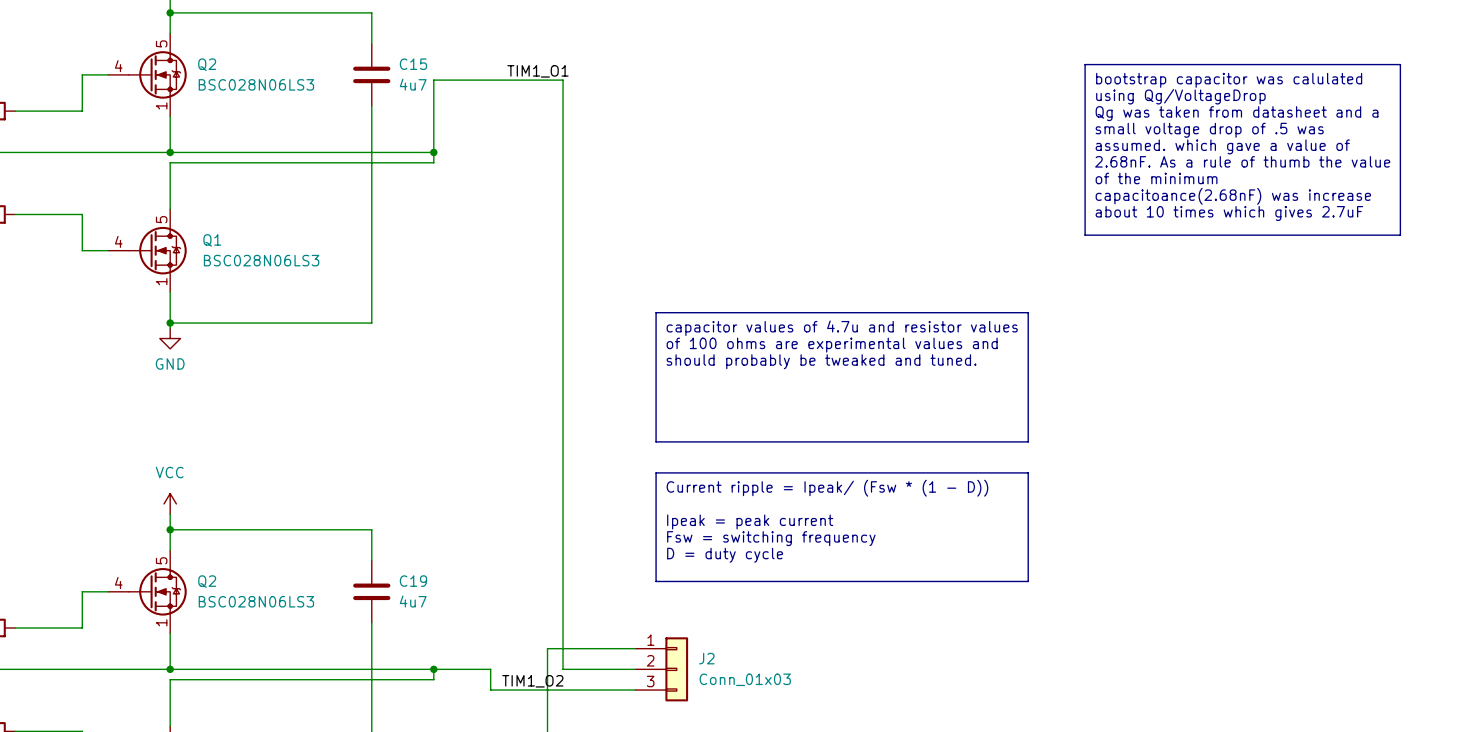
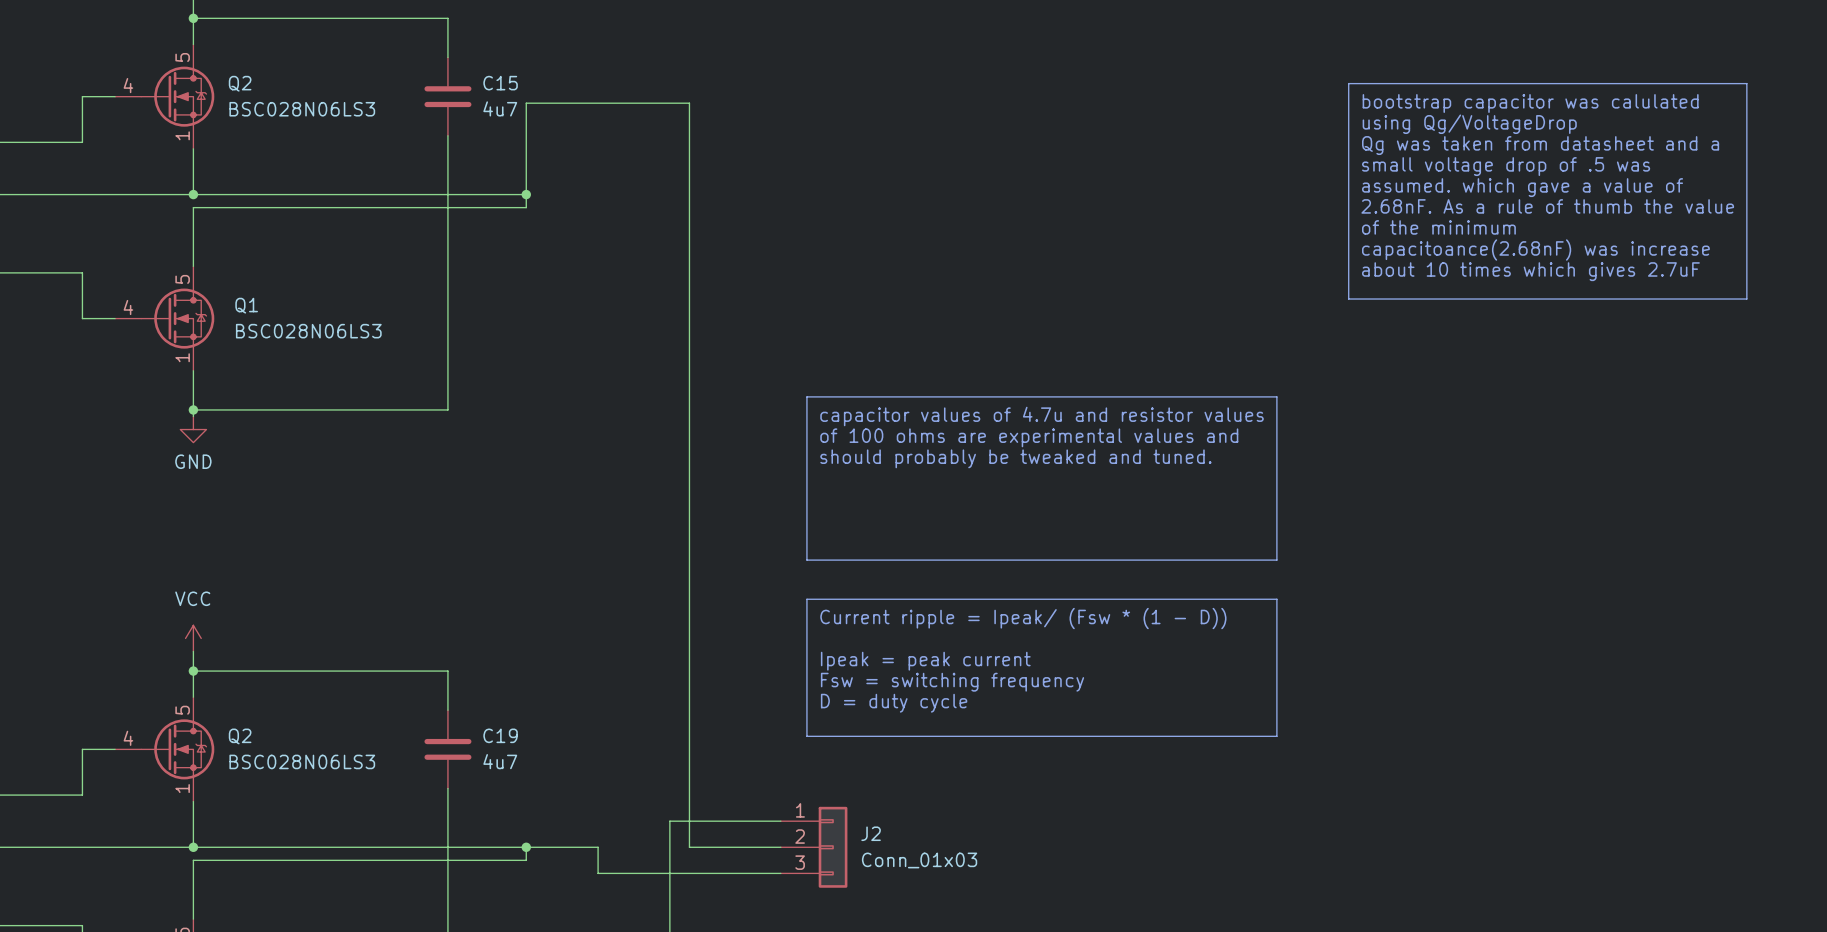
label: TIM1_O1 (537, 71) -> none
label: TIM1_O2 (532, 681) -> none

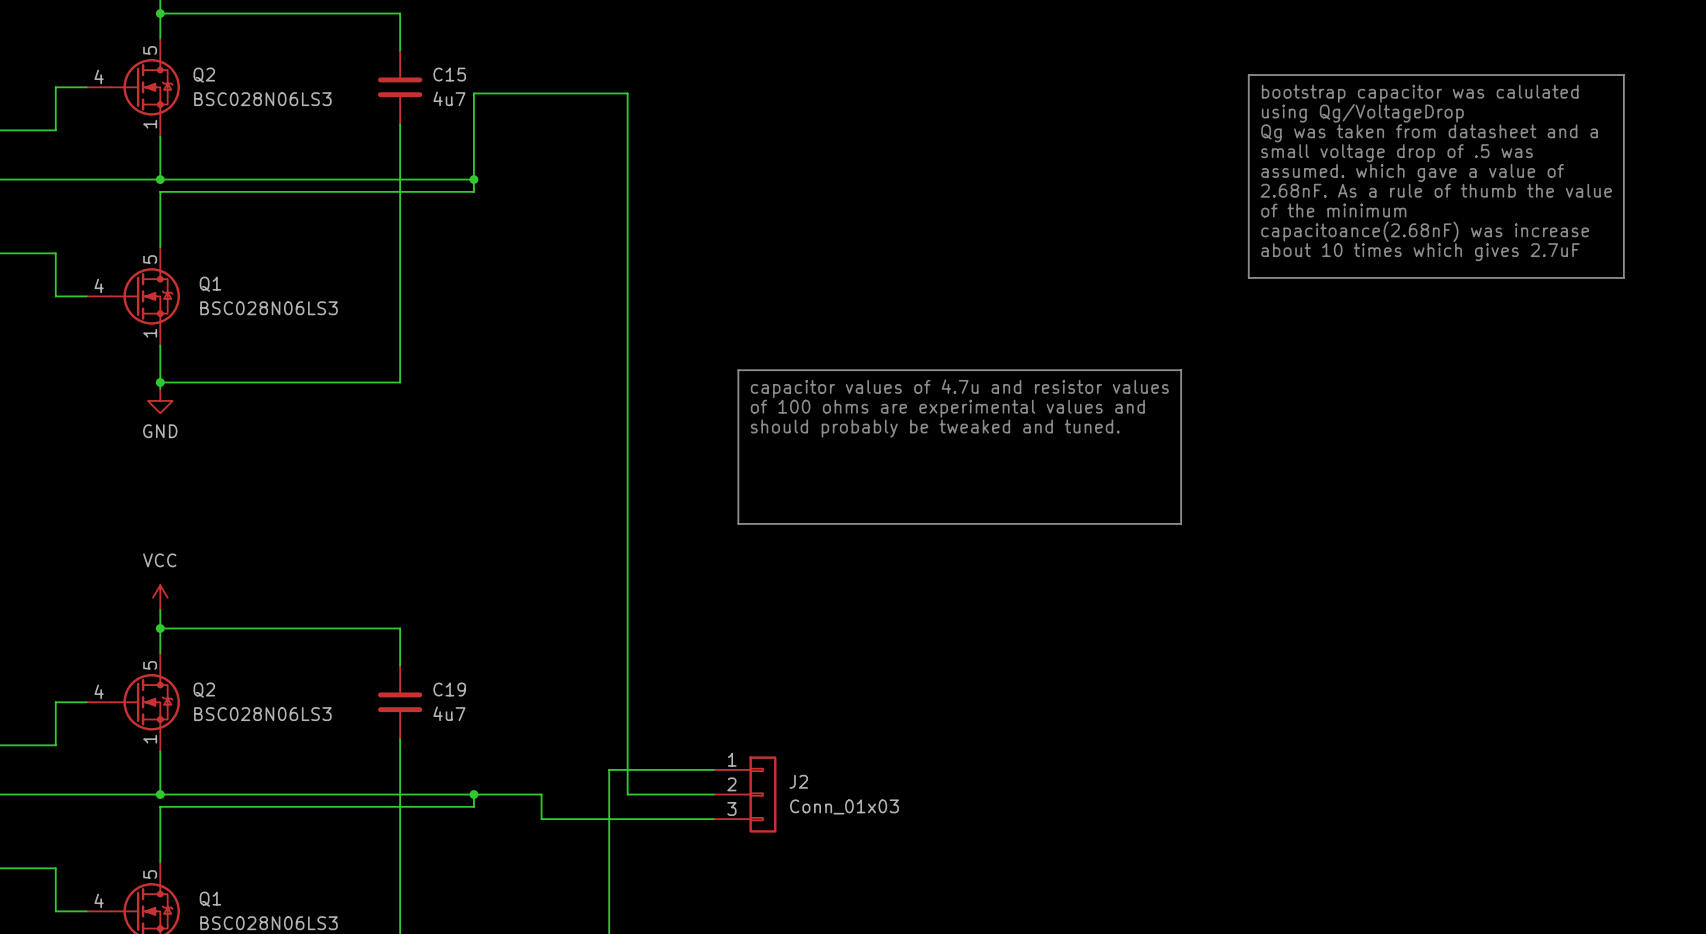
line: (806, 599) (1276, 599) (1276, 736) (806, 736) (806, 599) -> none
text: Current ripple = Ipeak/ (Fsw * (1 - D)) (1023, 618) -> none
text: Ipeak = peak current (925, 661) -> none
text: Fsw = switching frequency (952, 682) -> none
text: D = duty cycle (894, 703) -> none

